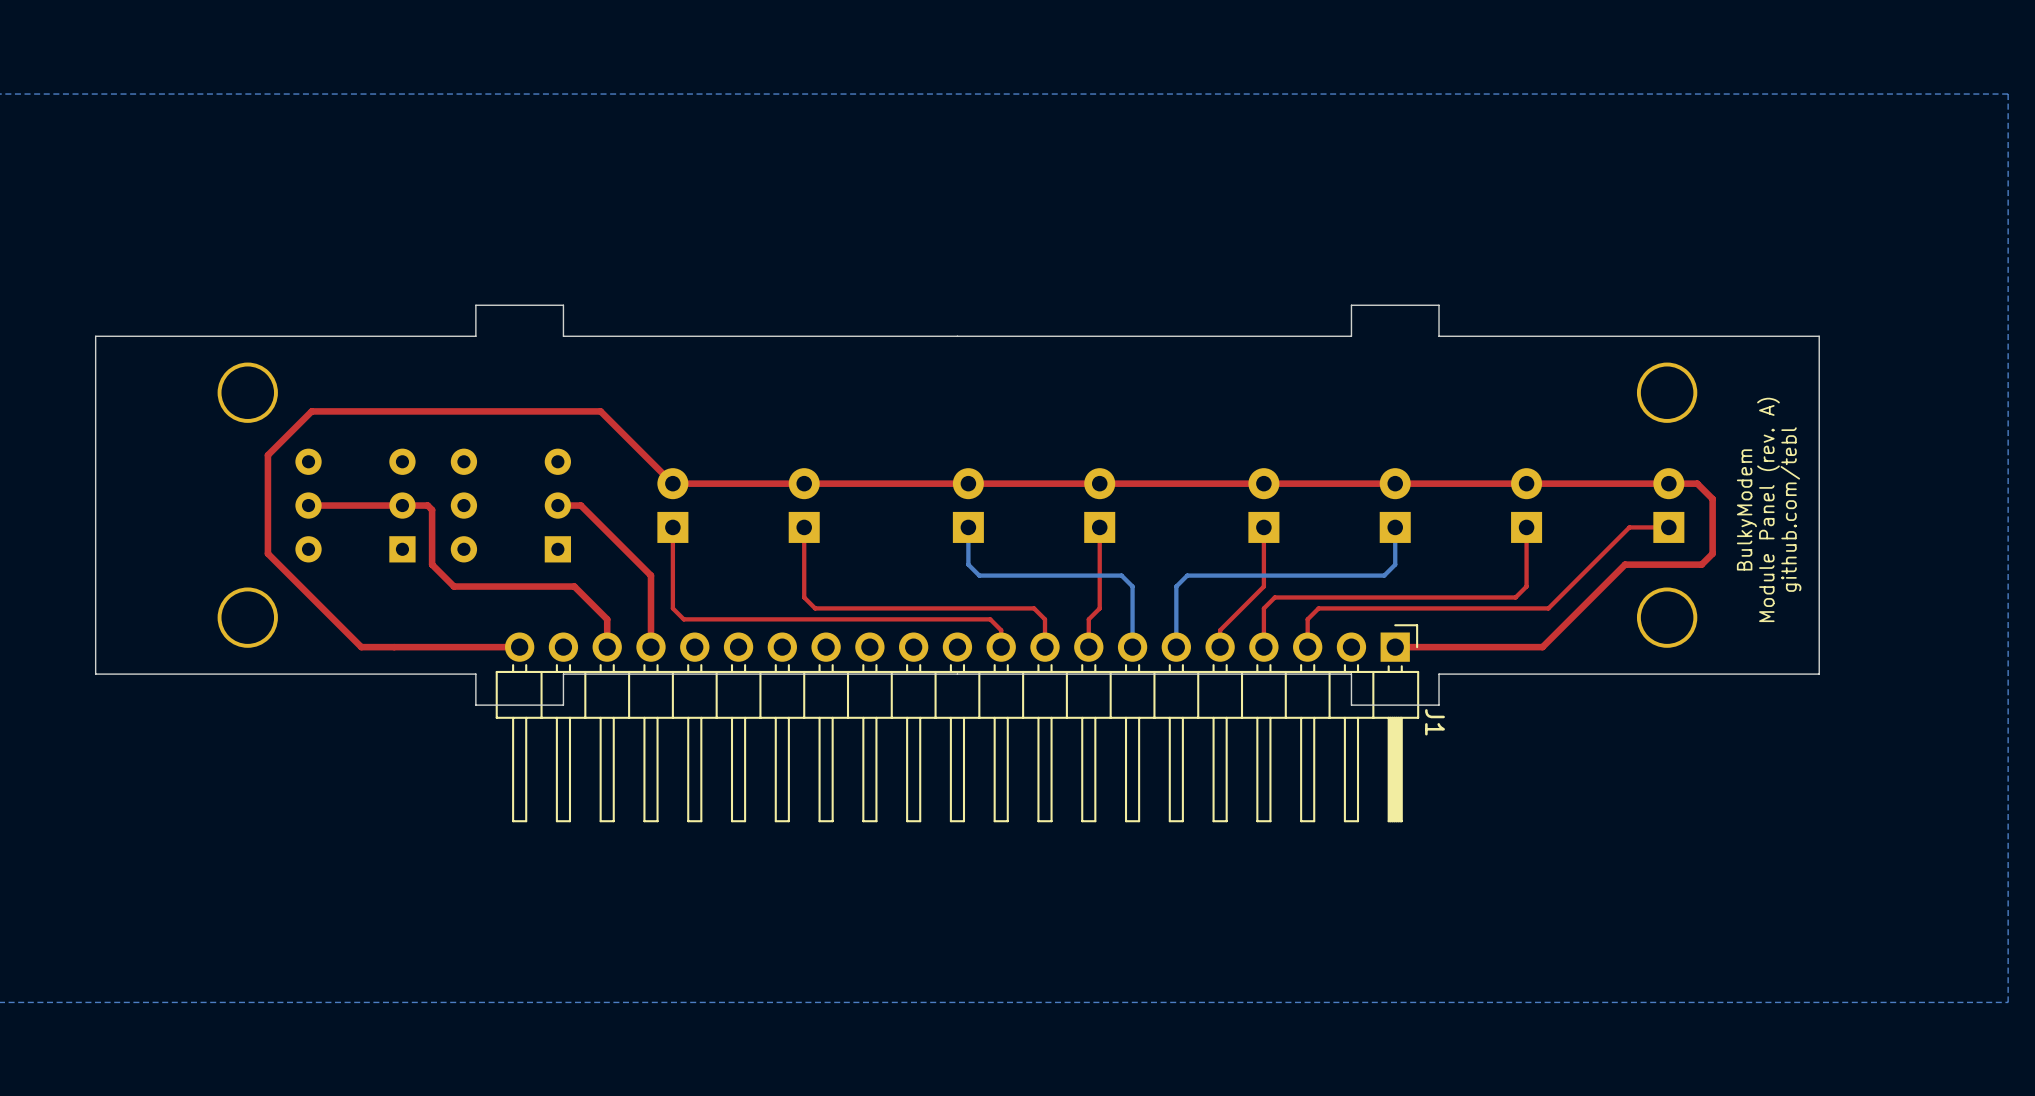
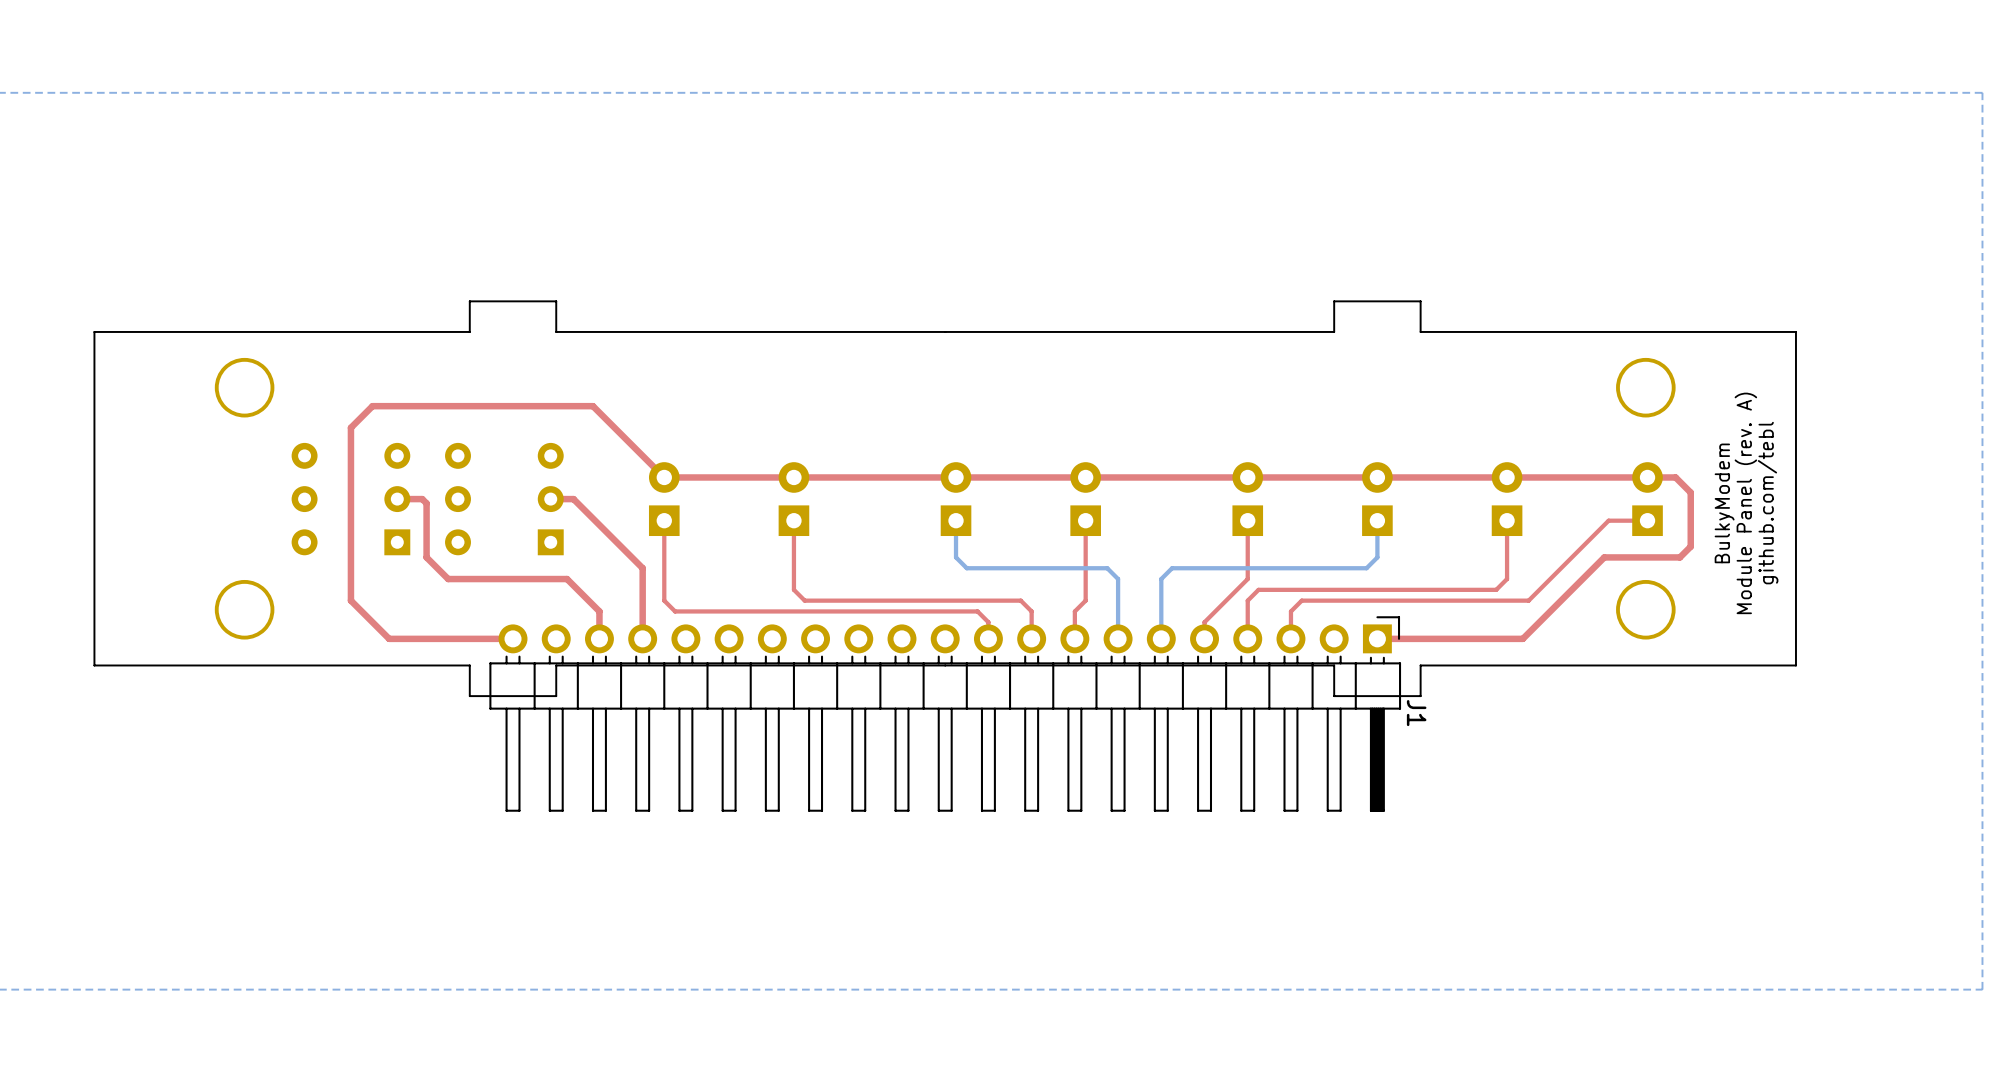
top track: (377, 411) (311, 411) (267, 455) (267, 553) (361, 647) (394, 647) -> (372, 406) (350, 427) (350, 600) (389, 638)
top track: (402, 505) (308, 505) -> none

